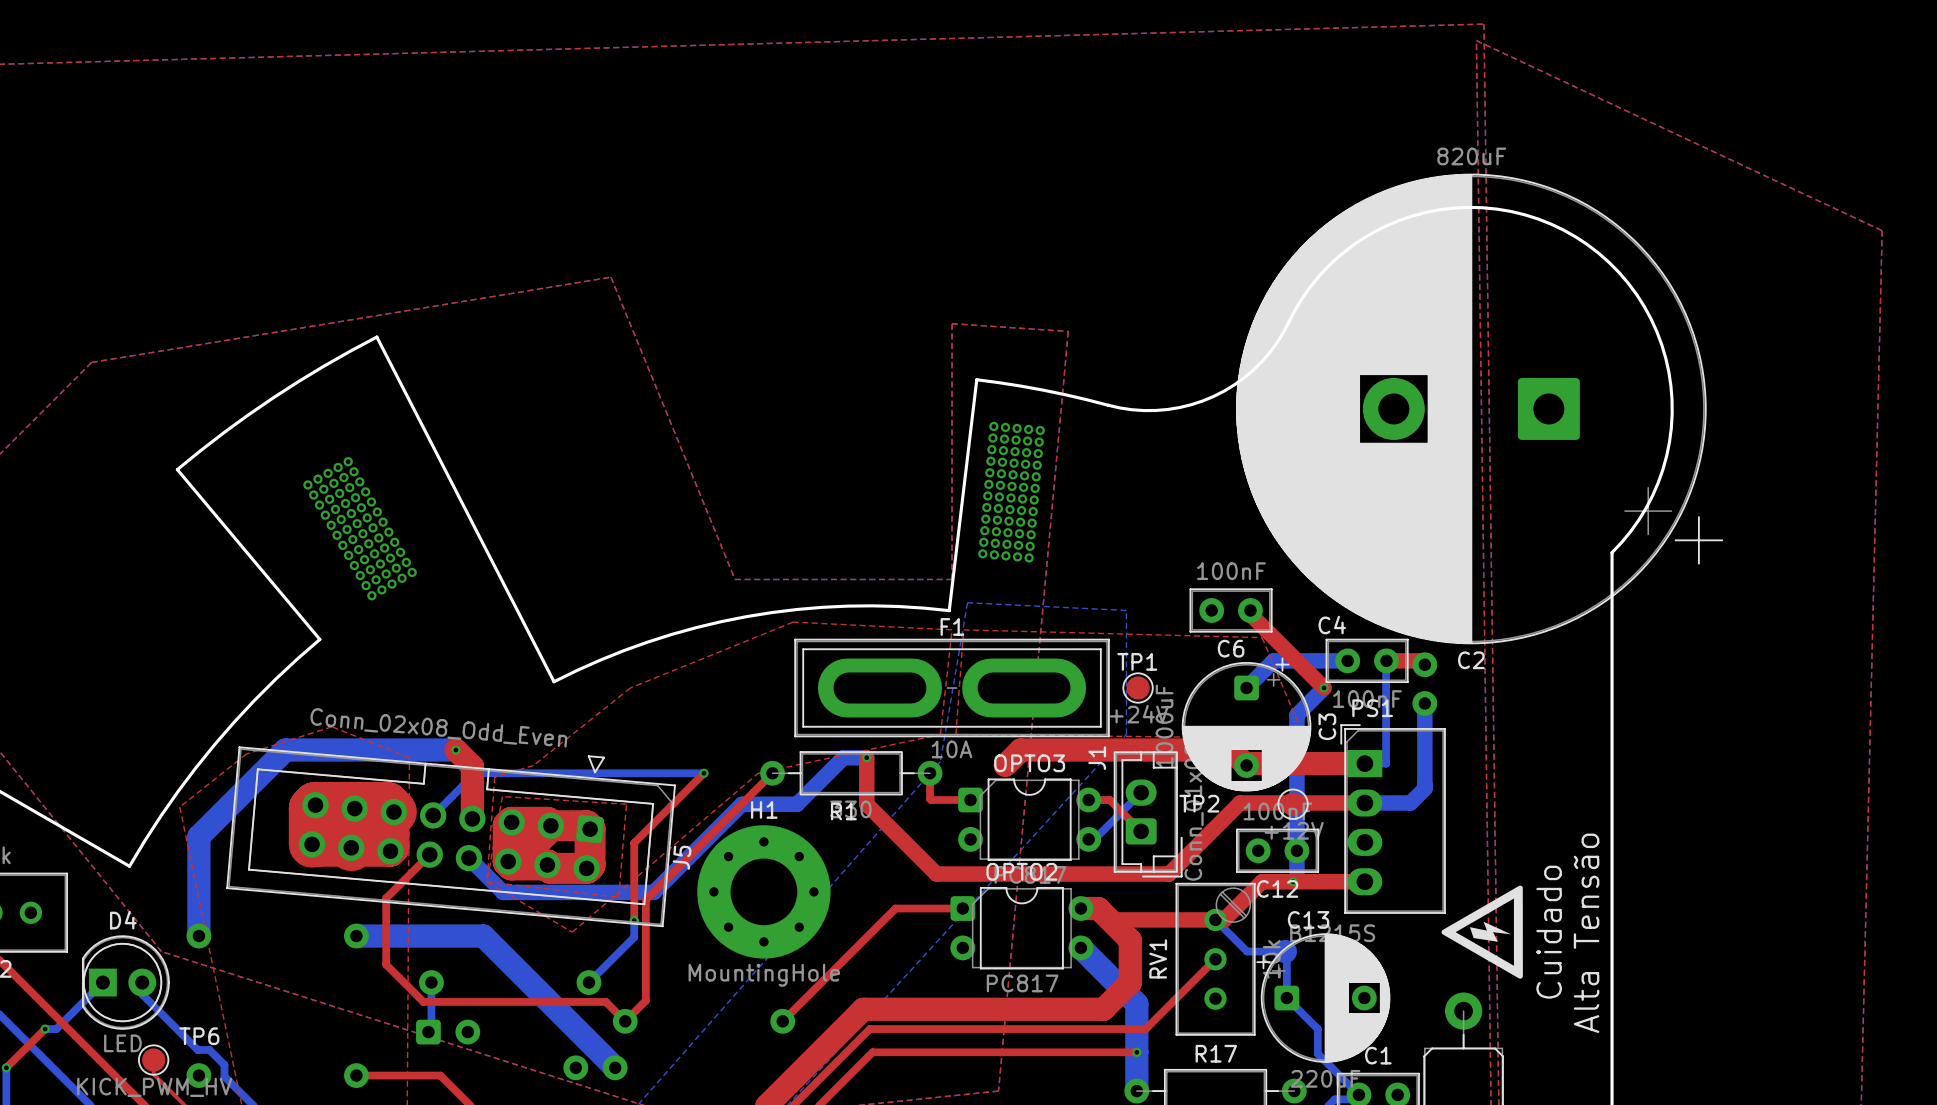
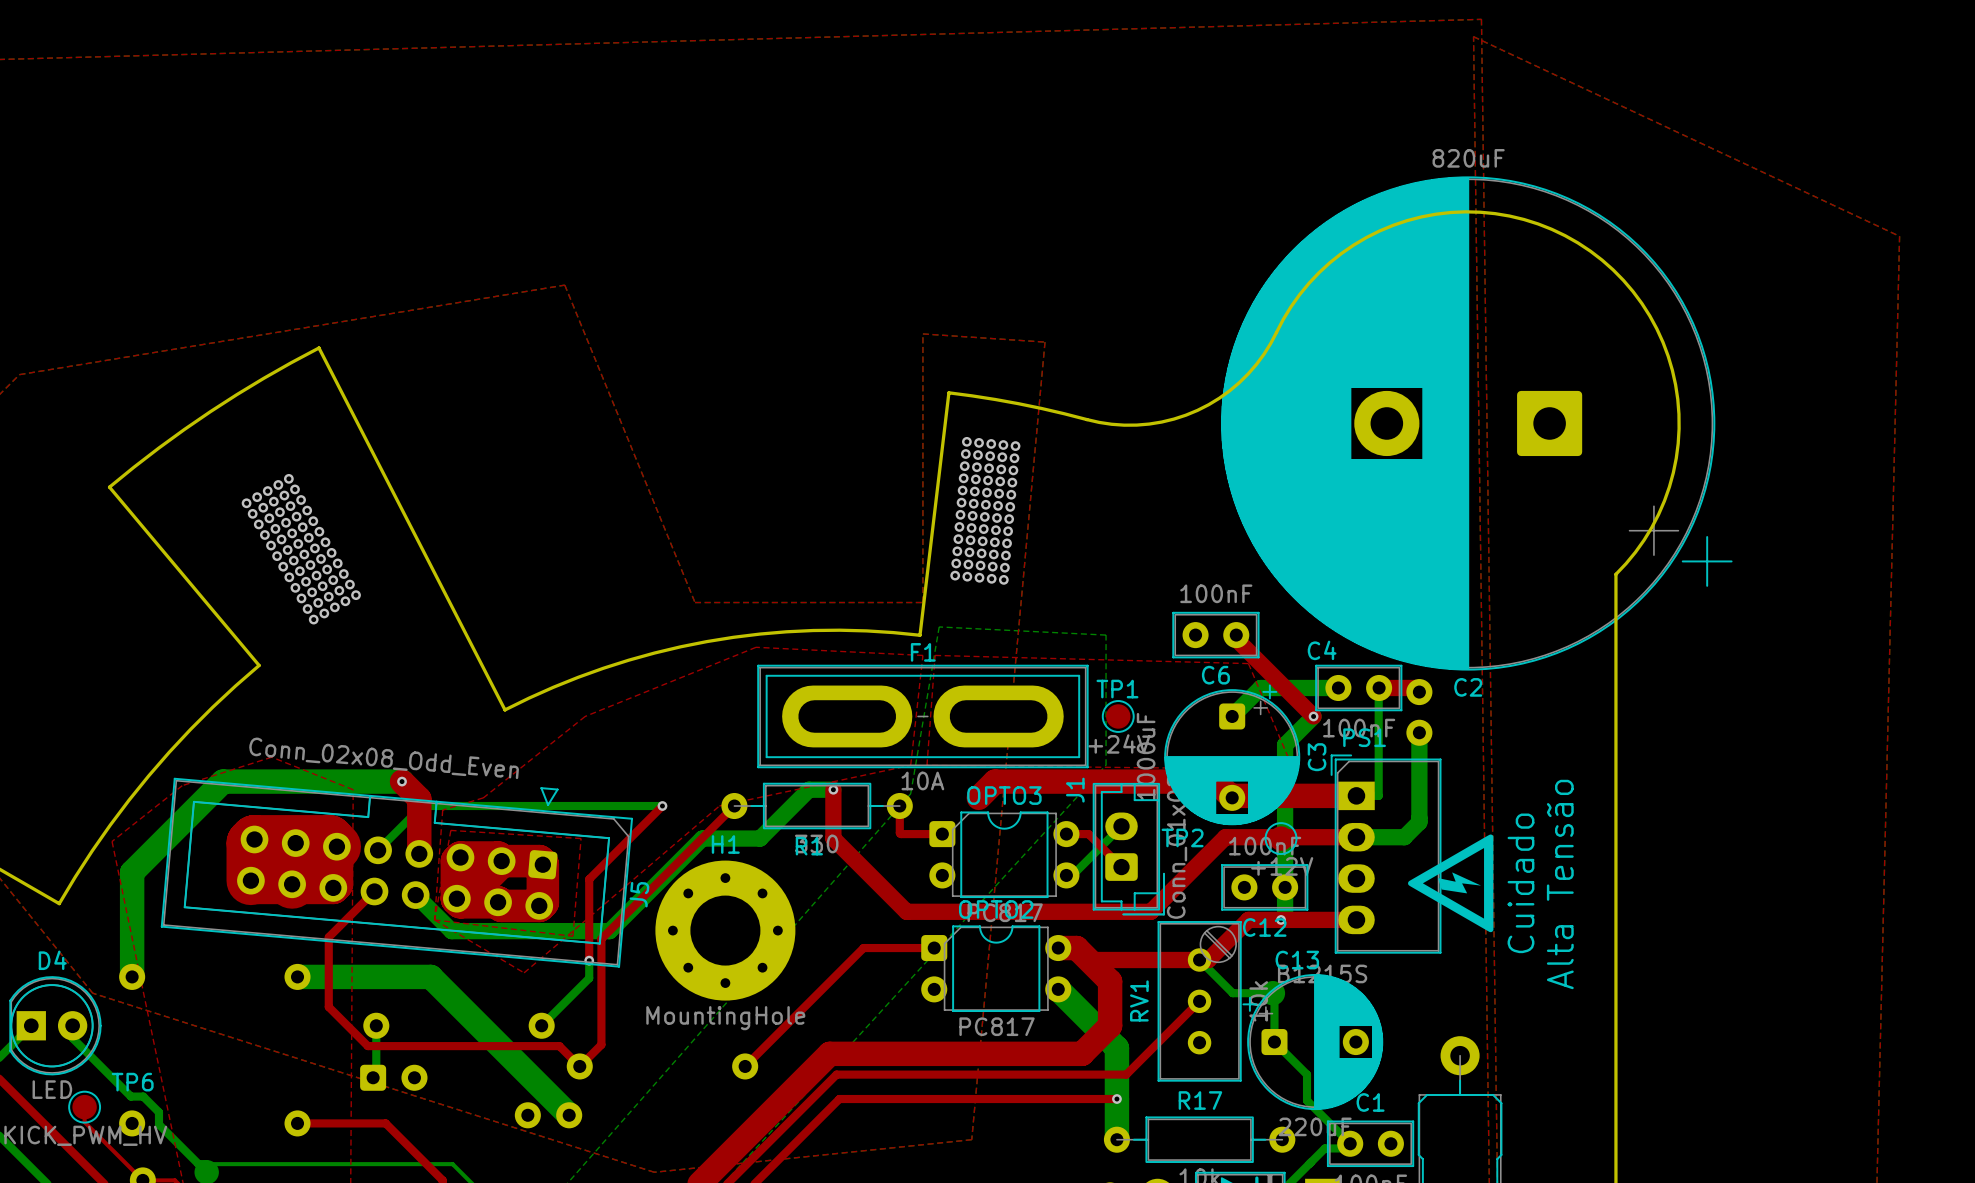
drawing position: (1482, 932) -> (1450, 883)
text position: Cuidado (1549, 932) -> Cuidado (1521, 883)
text position: Alta Tensão (1586, 933) -> Alta Tensão (1560, 884)

